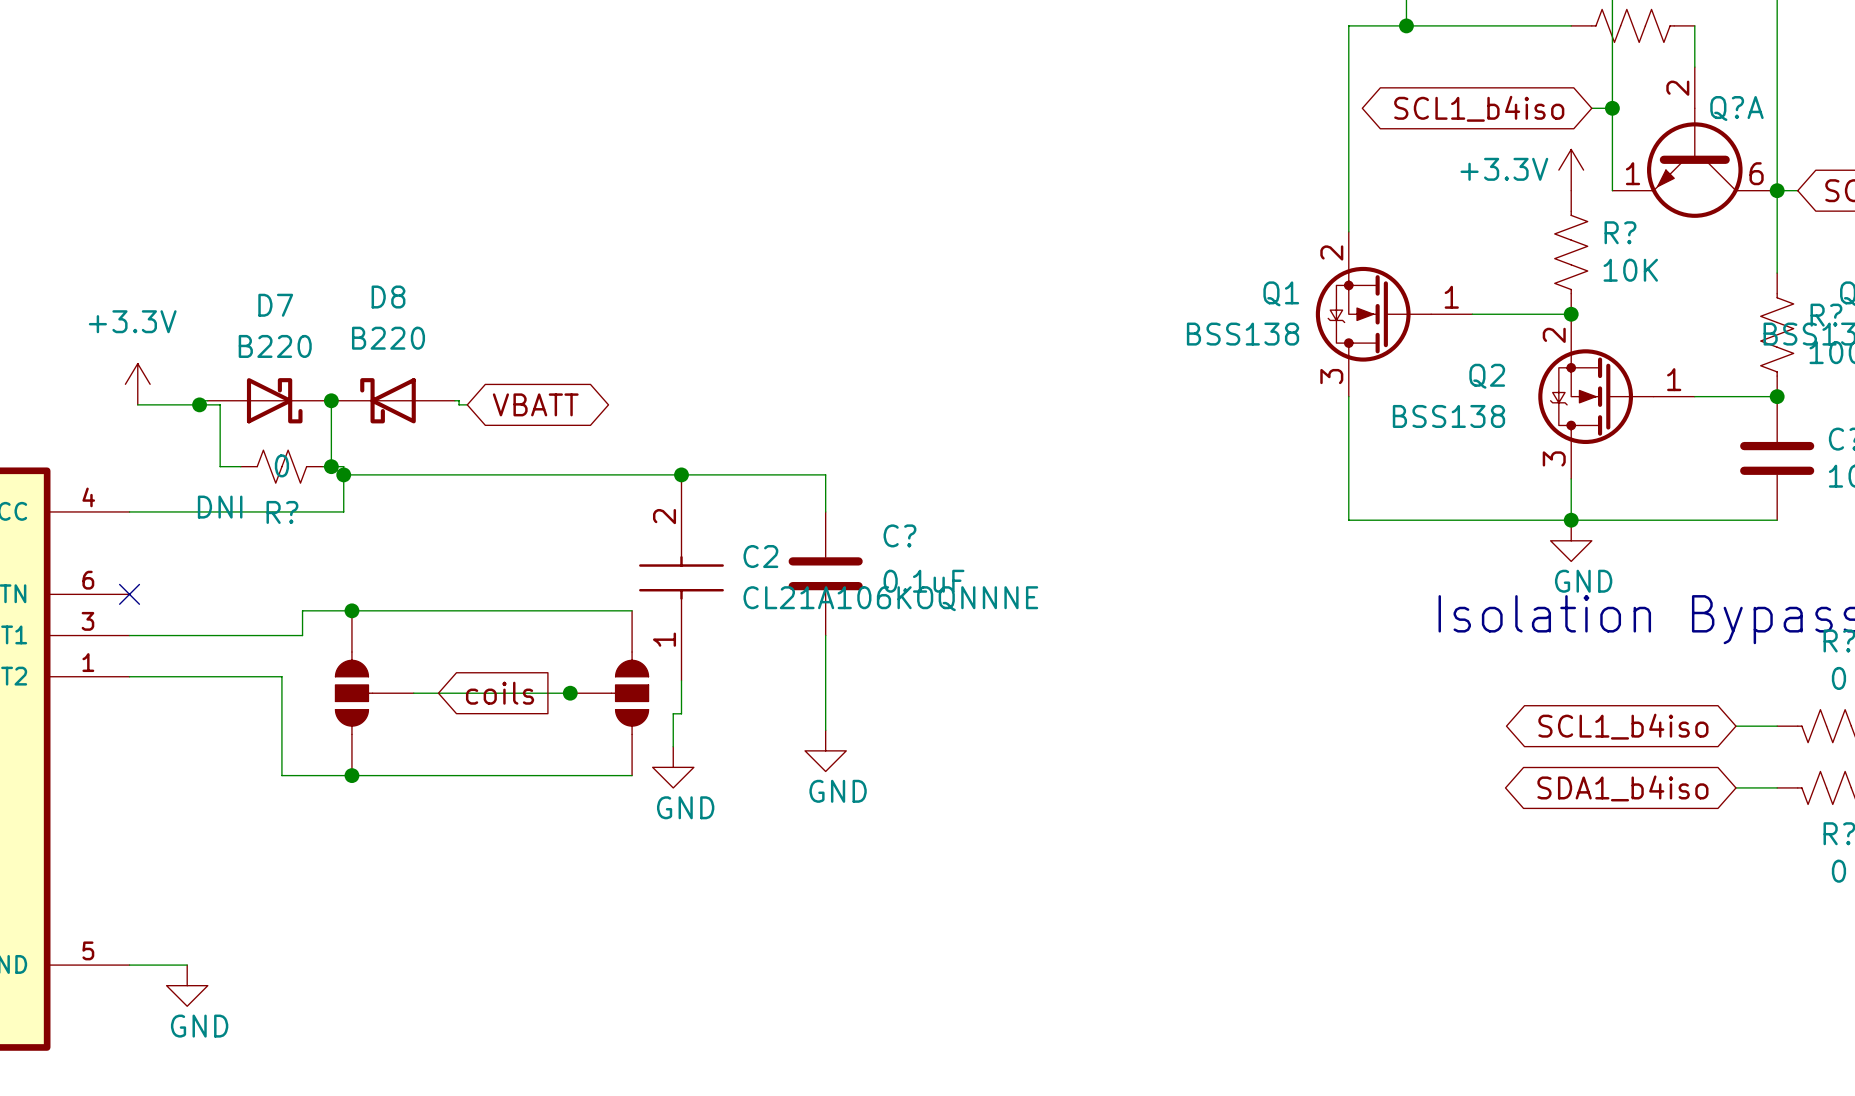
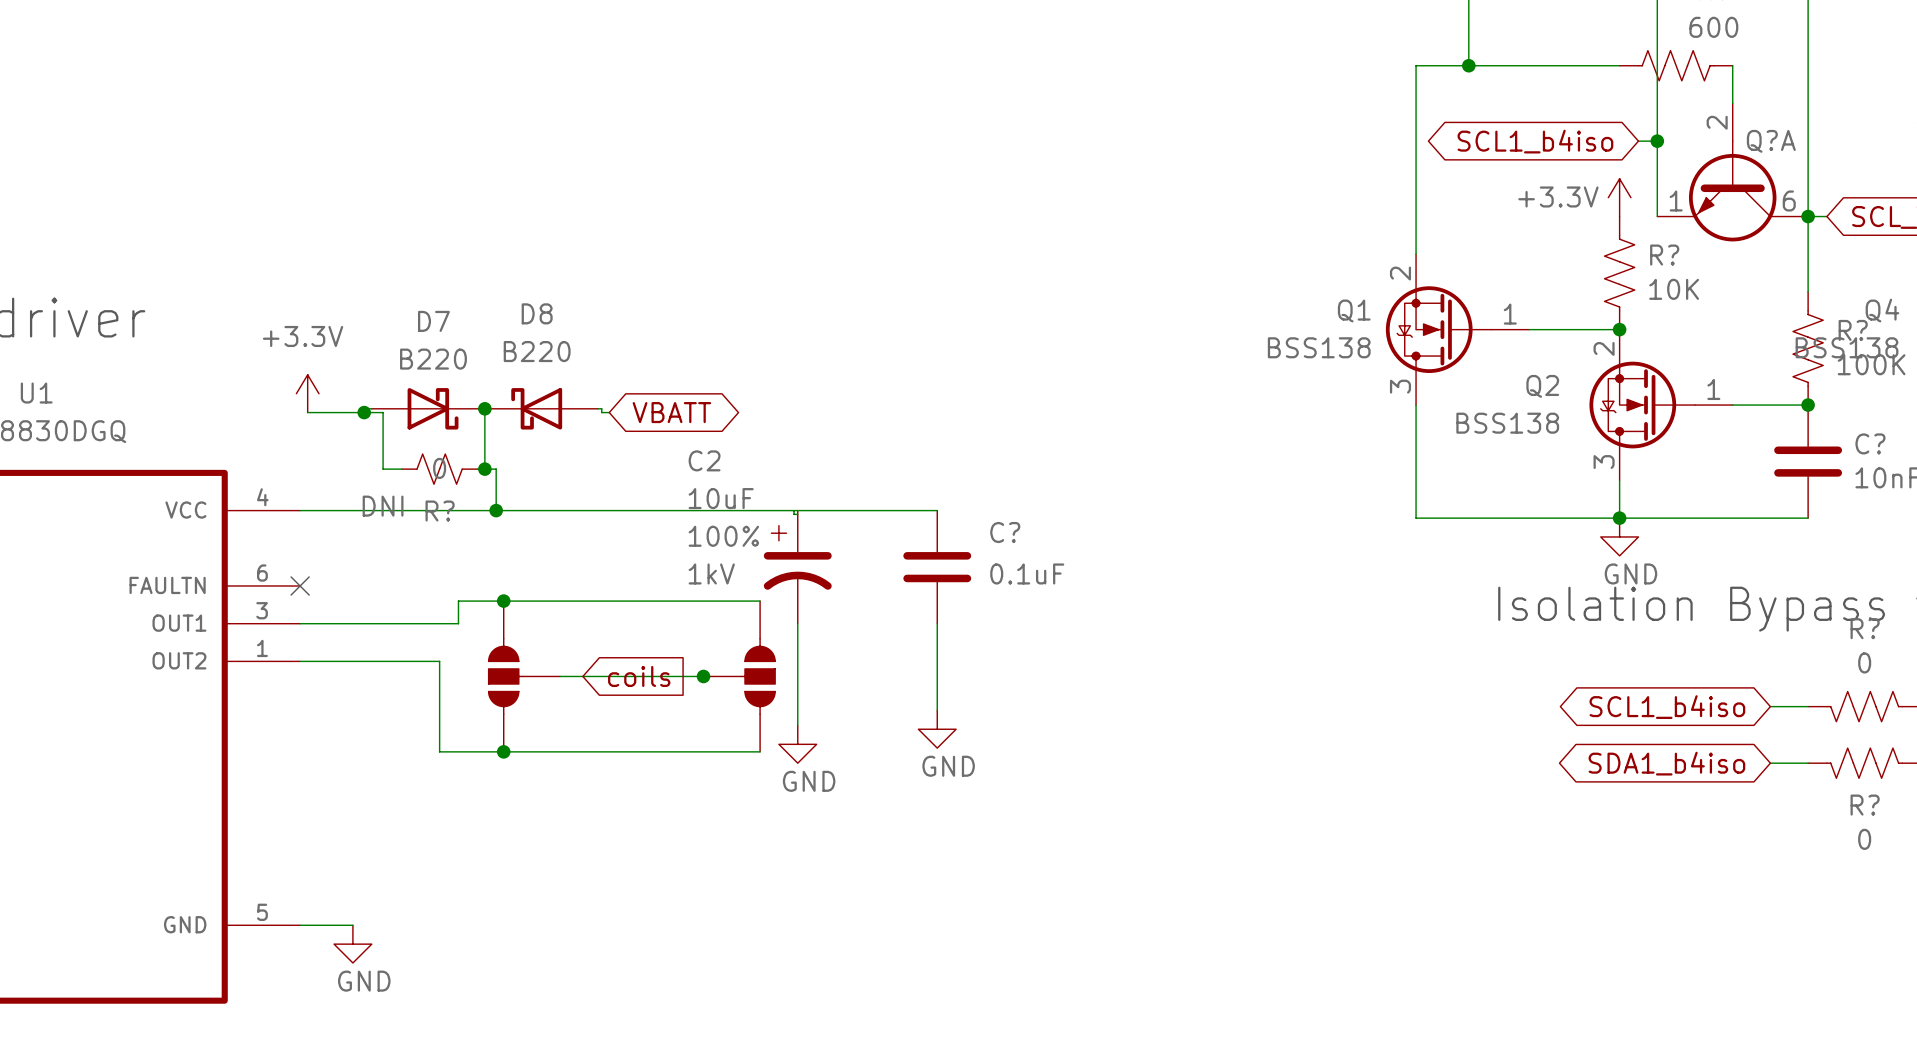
wire: (343, 474) (825, 474) (825, 511) -> (496, 510) (937, 510)
junction position: (343, 474) -> (496, 510)
C2 symbol: [639, 474, 724, 681] -> [763, 510, 832, 624]
junction: (681, 474) -> none
wire: none -> (794, 510) (794, 514) (797, 514)
C2 text: none -> 100% (723, 536)
C2 name position: C2 (760, 556) -> C2 (704, 460)
C2 text: none -> 1kV (711, 573)
C2 value: CL21A106KOQNNNE (890, 598) -> 10uF (721, 498)
wire: (681, 680) (681, 713) (673, 713) -> (797, 623) (797, 695)

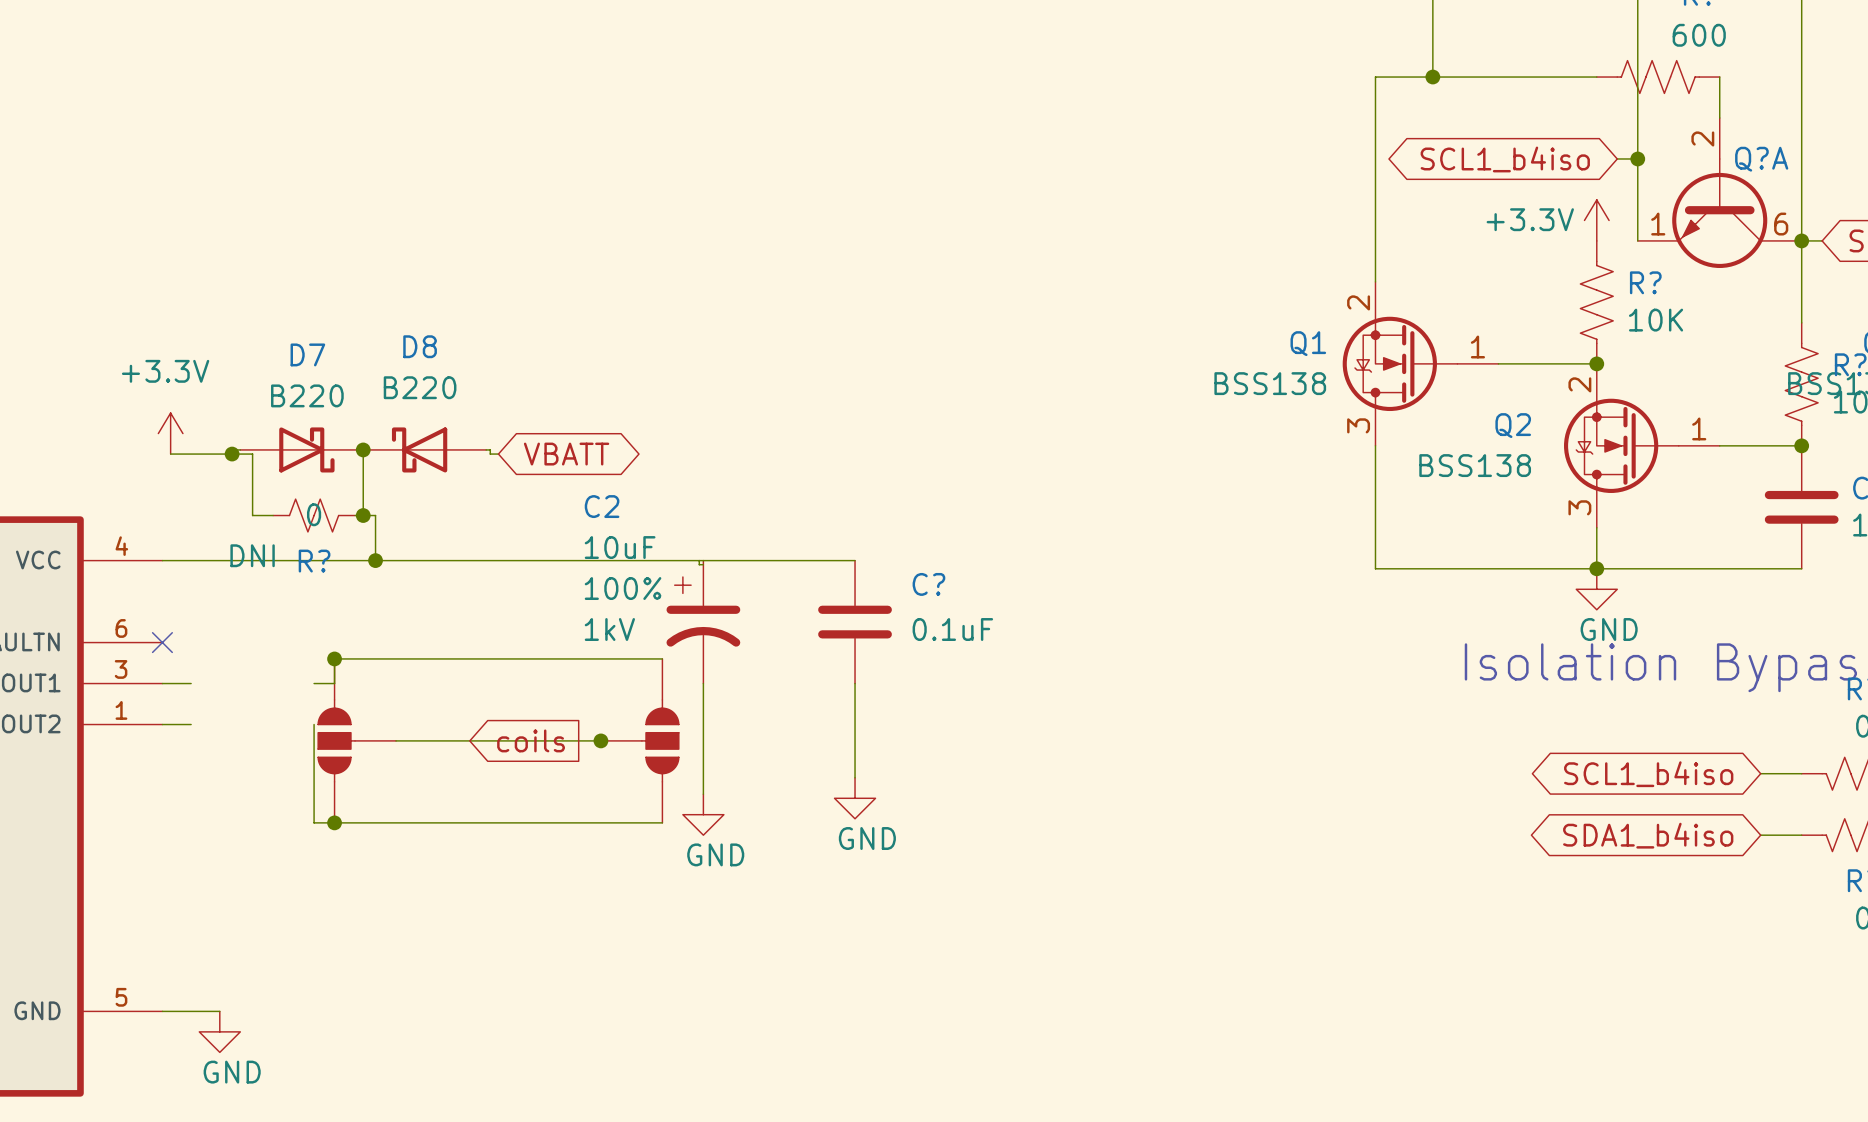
junction position: (503, 601) -> (334, 658)
wire: (326, 623) (439, 623) -> none
wire: (326, 661) (439, 661) -> none
part position: (524, 676) -> (357, 740)
junction position: (503, 751) -> (334, 822)

